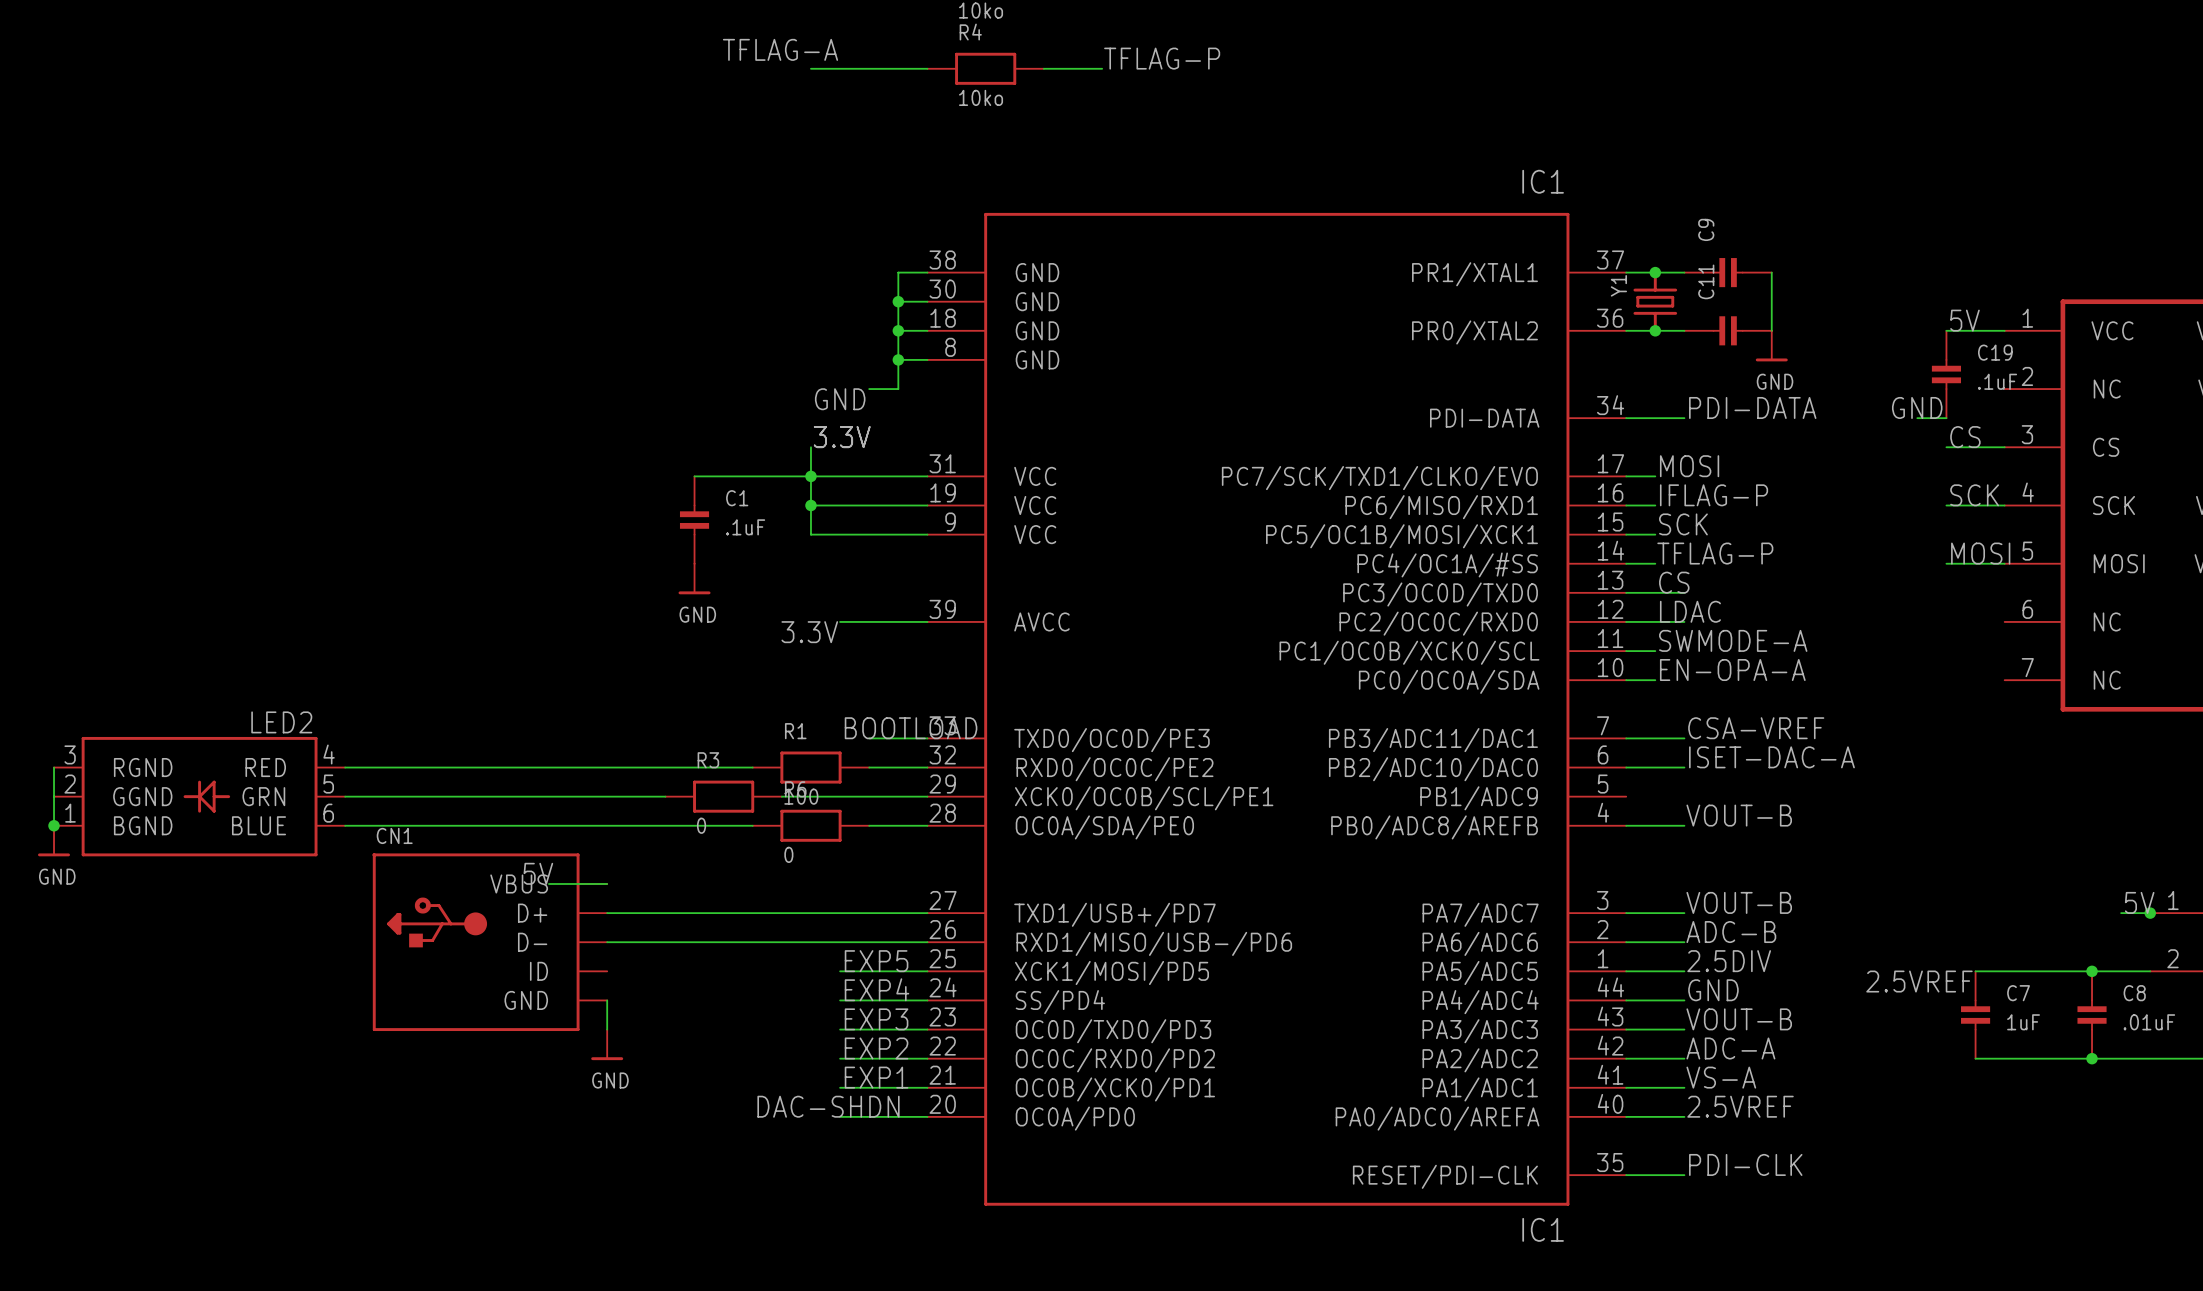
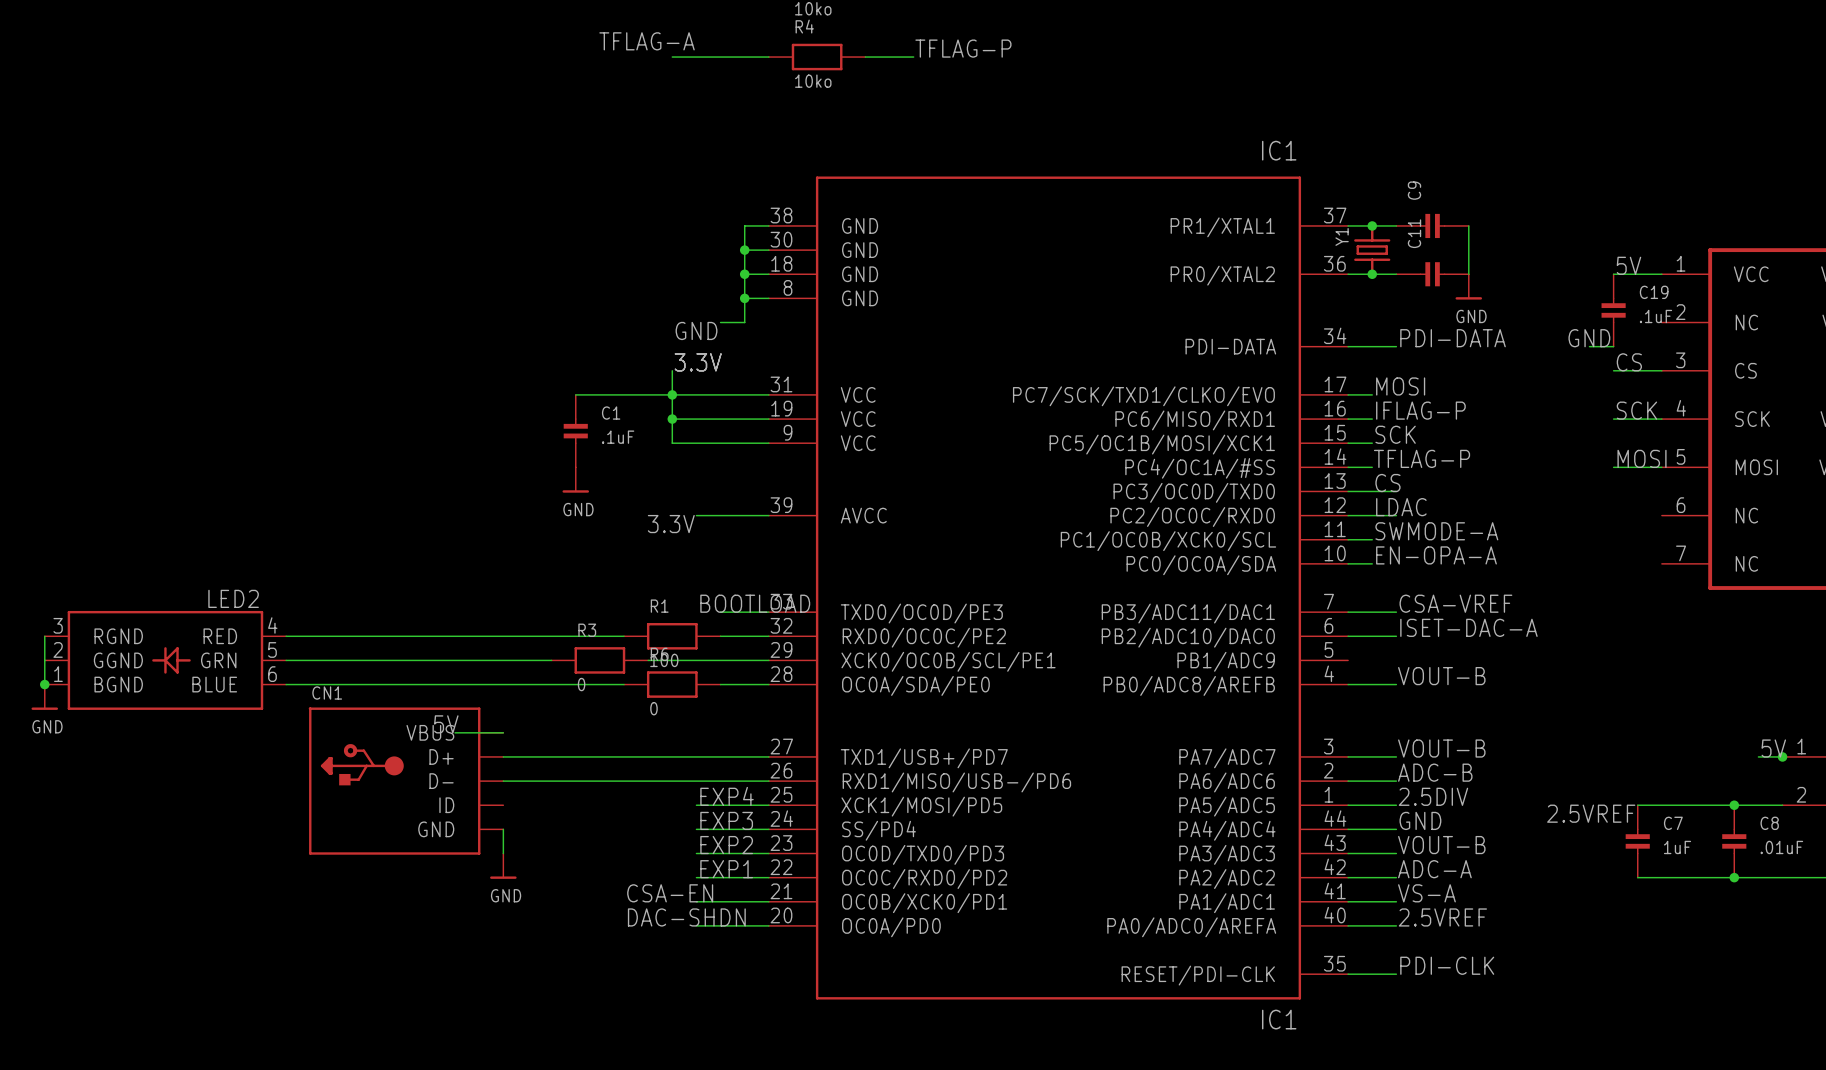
label: EXP5 (876, 961) -> EXP4 (727, 796)
label: EXP4 (876, 989) -> EXP3 (726, 820)
label: EXP3 (876, 1019) -> EXP2 (726, 845)
label: EXP2 (876, 1048) -> EXP1 (726, 869)
label: none -> CSA-EN (670, 893)
label: EXP1 (876, 1077) -> none

